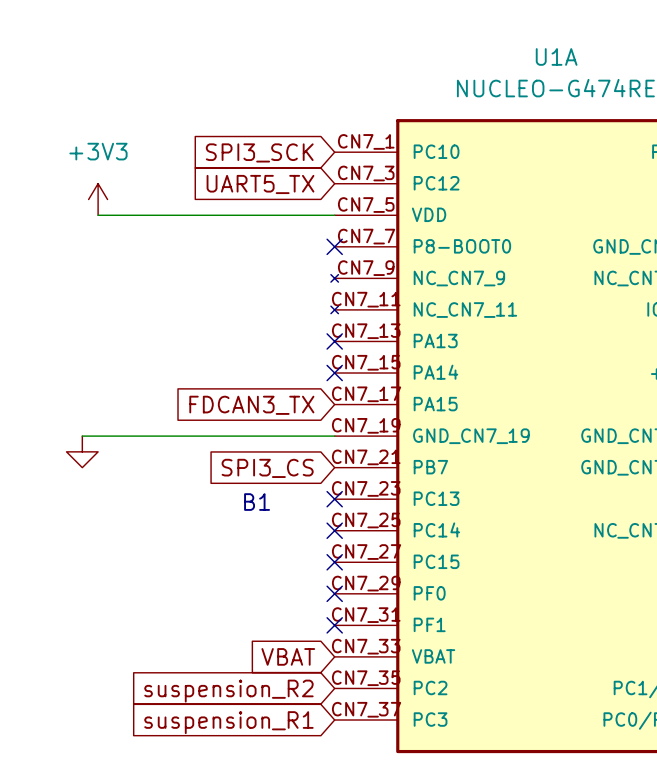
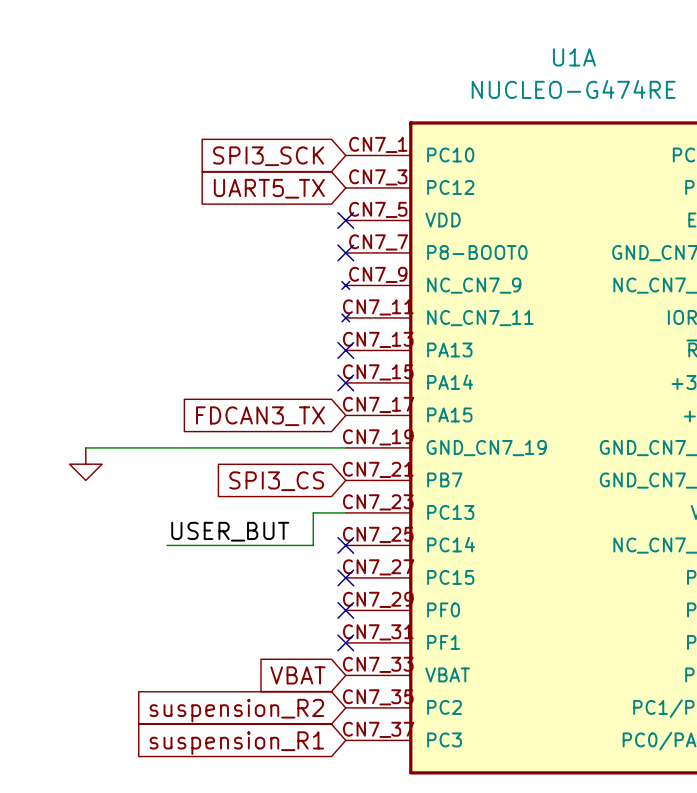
power symbol: +3V3 (98, 199) -> none
wire: (98, 215) (334, 215) -> none
no-connect mark: none -> (345, 220)
wire: none -> (345, 512) (313, 512) (313, 545) (167, 545)
no-connect mark: (334, 499) -> none
text: B1 (257, 502) -> none
label: none -> USER_BUT (230, 531)

